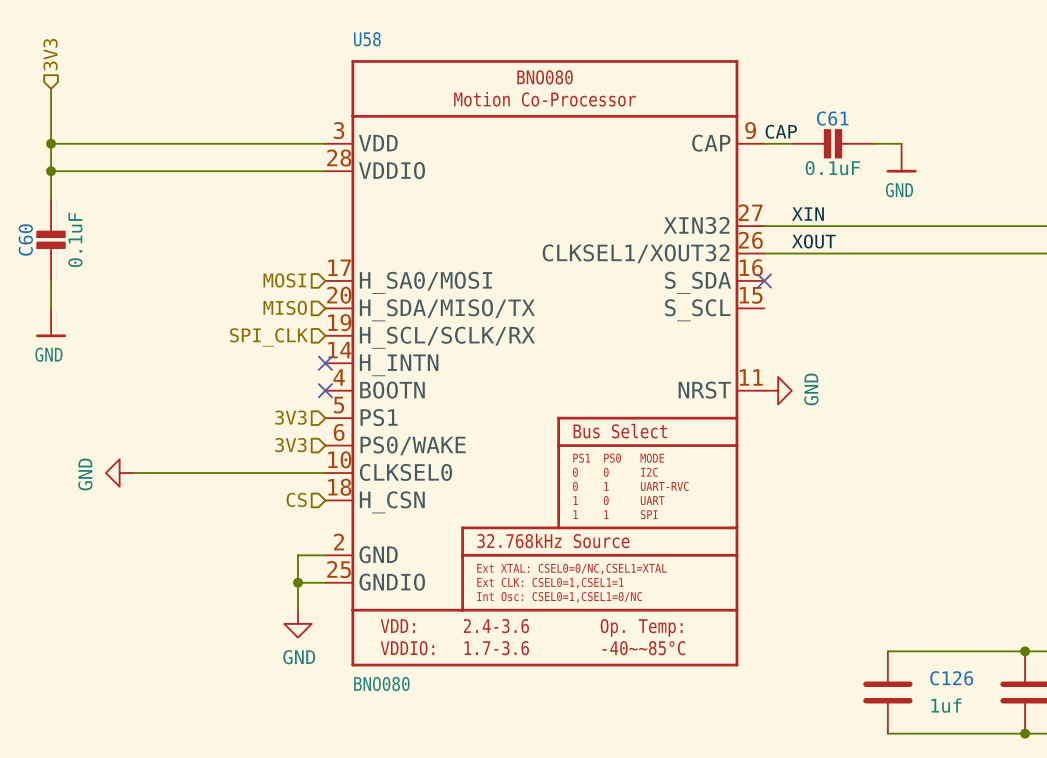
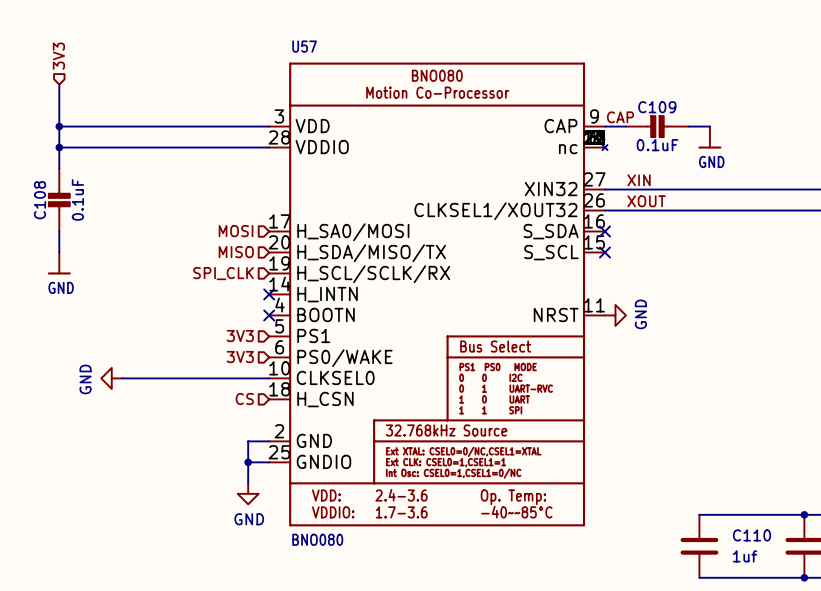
C61 name: C61 (832, 118) -> C109 (657, 107)
C60 name: C60 (25, 239) -> C108 (39, 200)
no-connect mark: none -> (604, 252)
U58: BNO080 (544, 363) -> none
U57: none -> BNO080 (438, 294)
C126 name: C126 (951, 678) -> C110 (751, 535)

